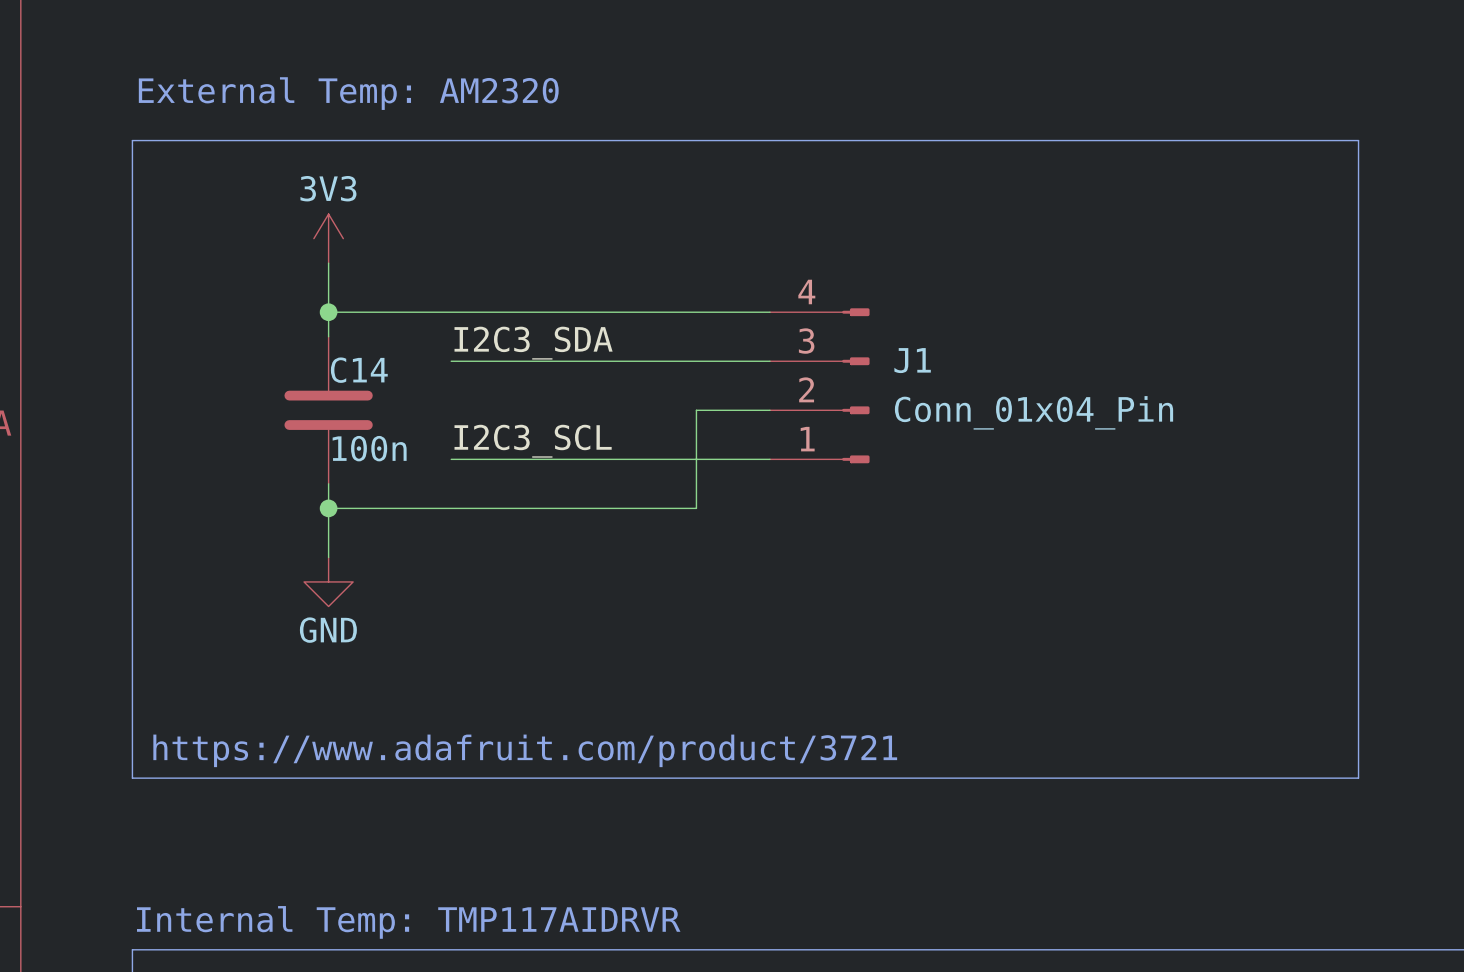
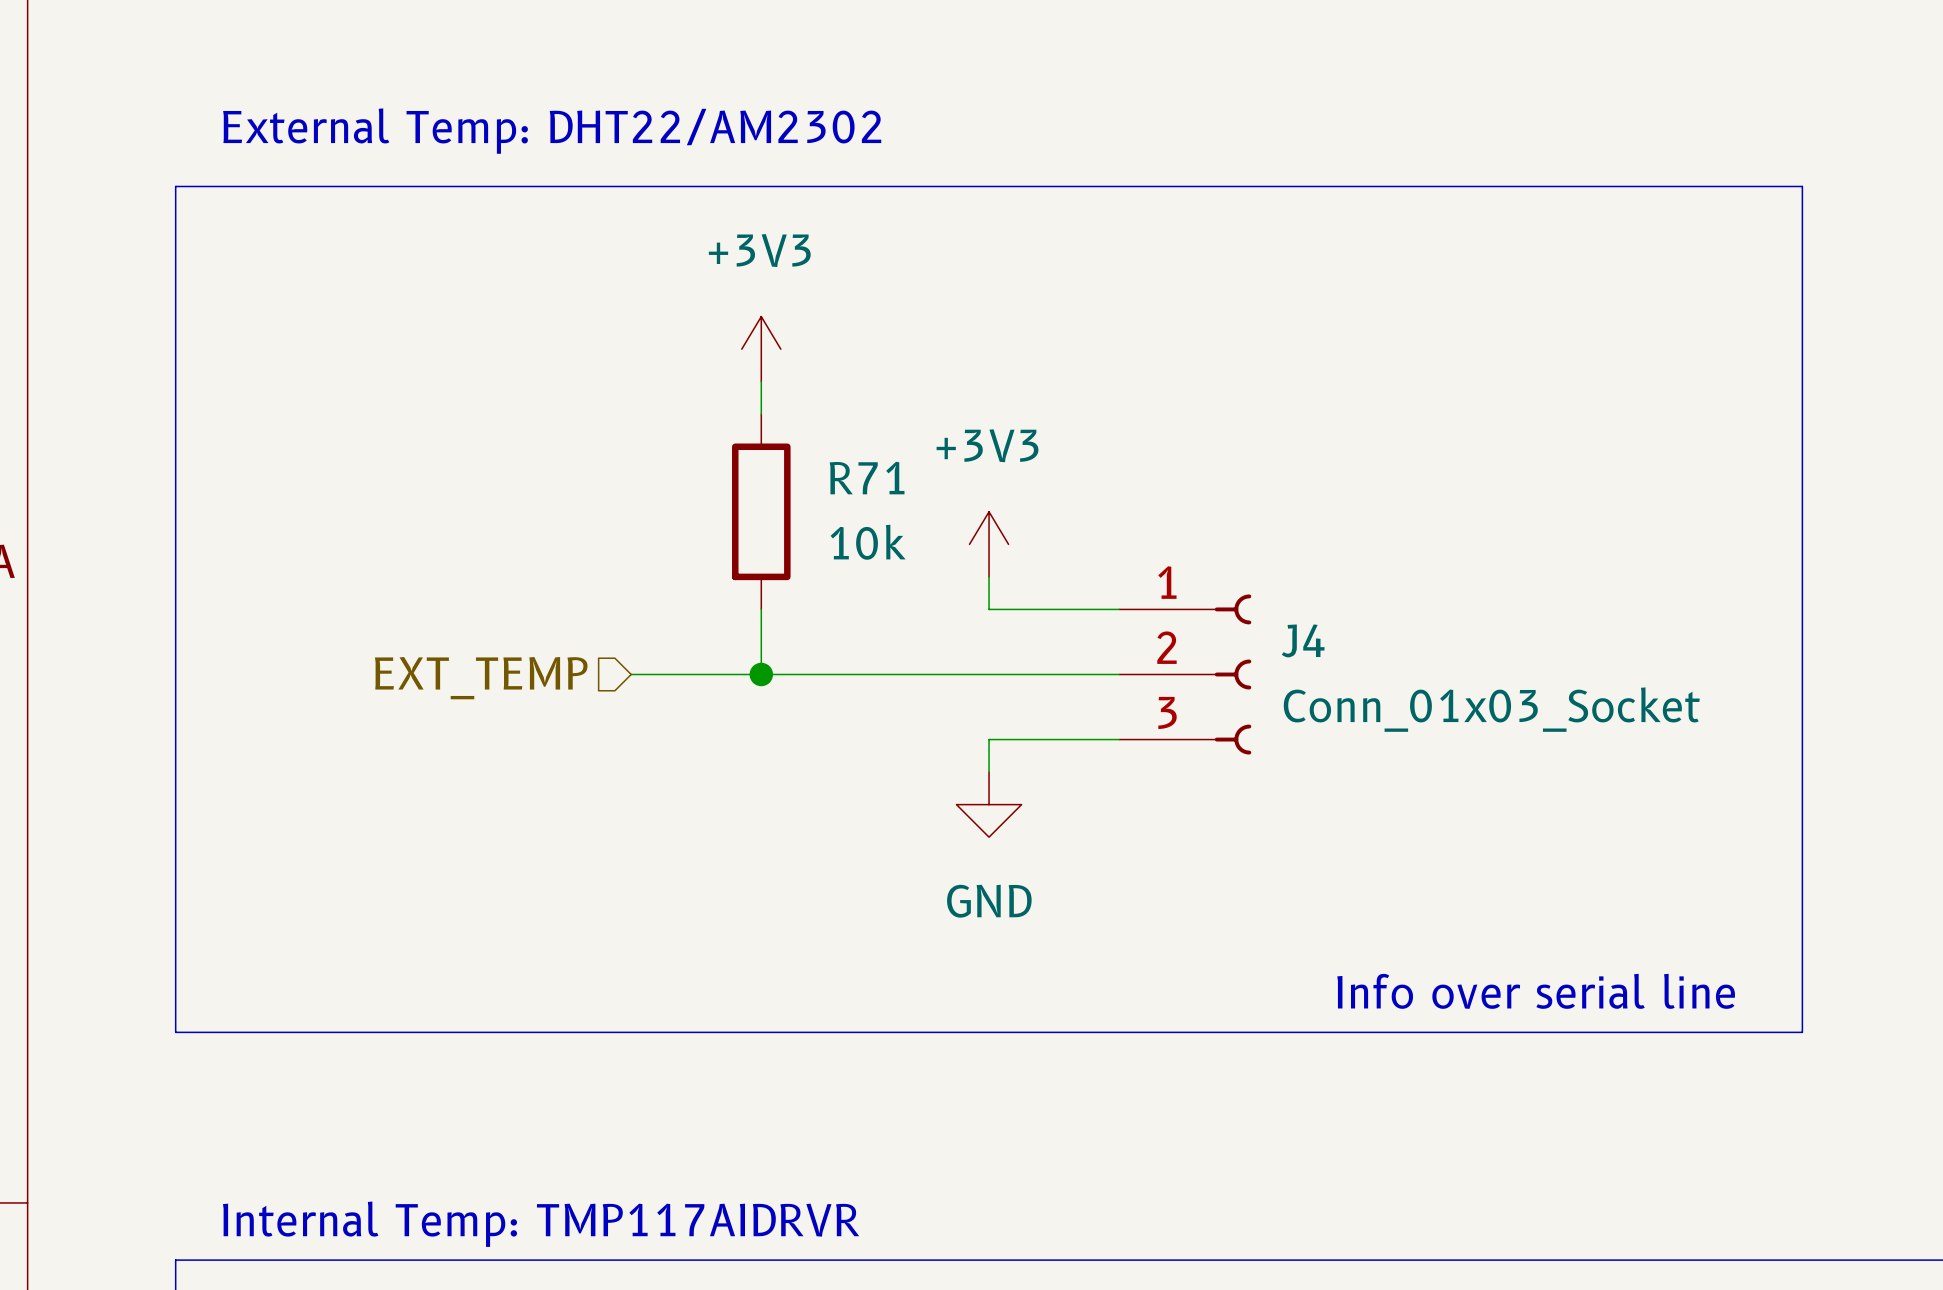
text: External Temp: AM2320 (348, 93) -> External Temp: DHT22/AM2302 (552, 131)
power symbol: 3V3 (328, 238) -> none
wire: (328, 263) (328, 336) -> none
power symbol: none -> +3V3 (761, 349)
wire: none -> (761, 381) (761, 414)
wire: (328, 312) (770, 312) -> none
junction: (328, 312) -> none
label: I2C3_SDA (533, 343) -> none
wire: (451, 361) (770, 361) -> none
R71: none -> 10k (761, 511)
J1: Conn_01x04_Pin (819, 385) -> none
C14: 100n (328, 410) -> none
power symbol: none -> +3V3 (989, 544)
wire: (770, 410) (696, 410) (696, 508) -> (1119, 674) (923, 674)
label: I2C3_SCL (533, 441) -> none
wire: (451, 459) (745, 459) -> (989, 576) (989, 609)
wire: none -> (761, 609) (761, 674)
wire: (328, 483) (328, 557) -> none
wire: (328, 508) (475, 508) -> none
junction: (328, 508) -> none
junction: none -> (761, 674)
J4: none -> Conn_01x03_Socket (1185, 674)
hierarchical label: none -> EXT_TEMP (481, 678)
wire: none -> (1119, 739) (989, 739) (989, 772)
power symbol position: GND (328, 581) -> GND (989, 804)
power symbol text position: GND (328, 630) -> GND (989, 901)
text: none -> Info over serial line (1536, 991)
text: https://www.adafruit.com/product/3721 (525, 750) -> none

